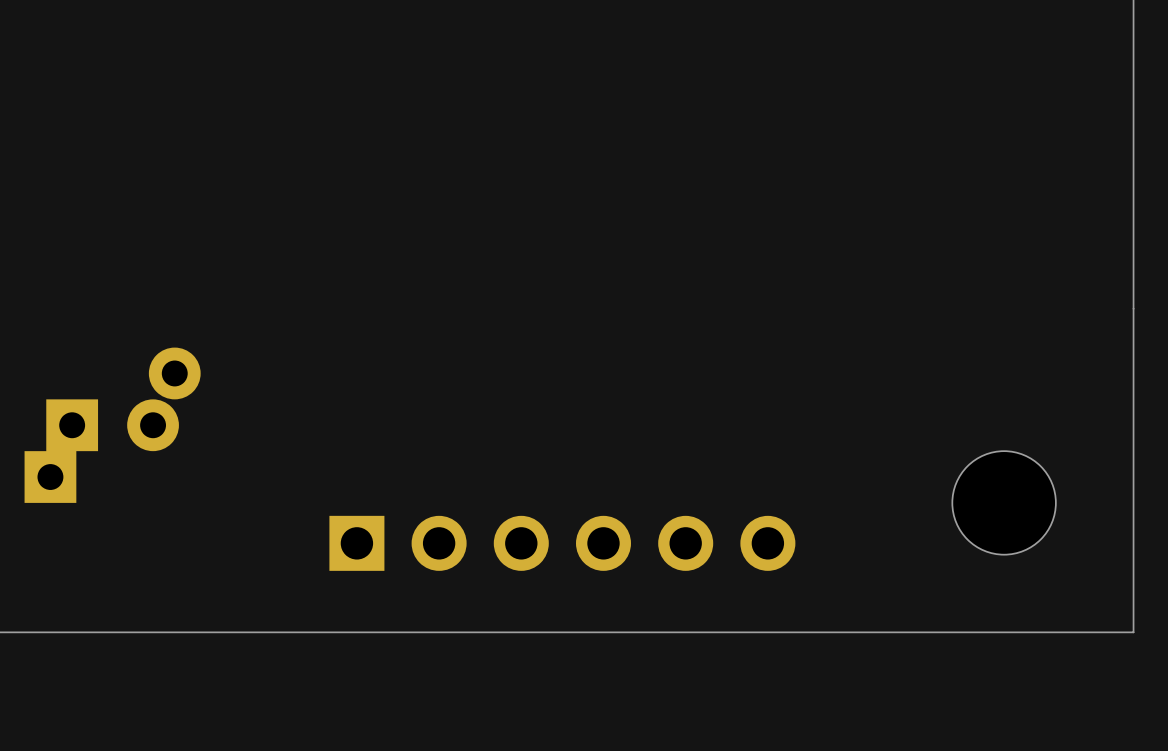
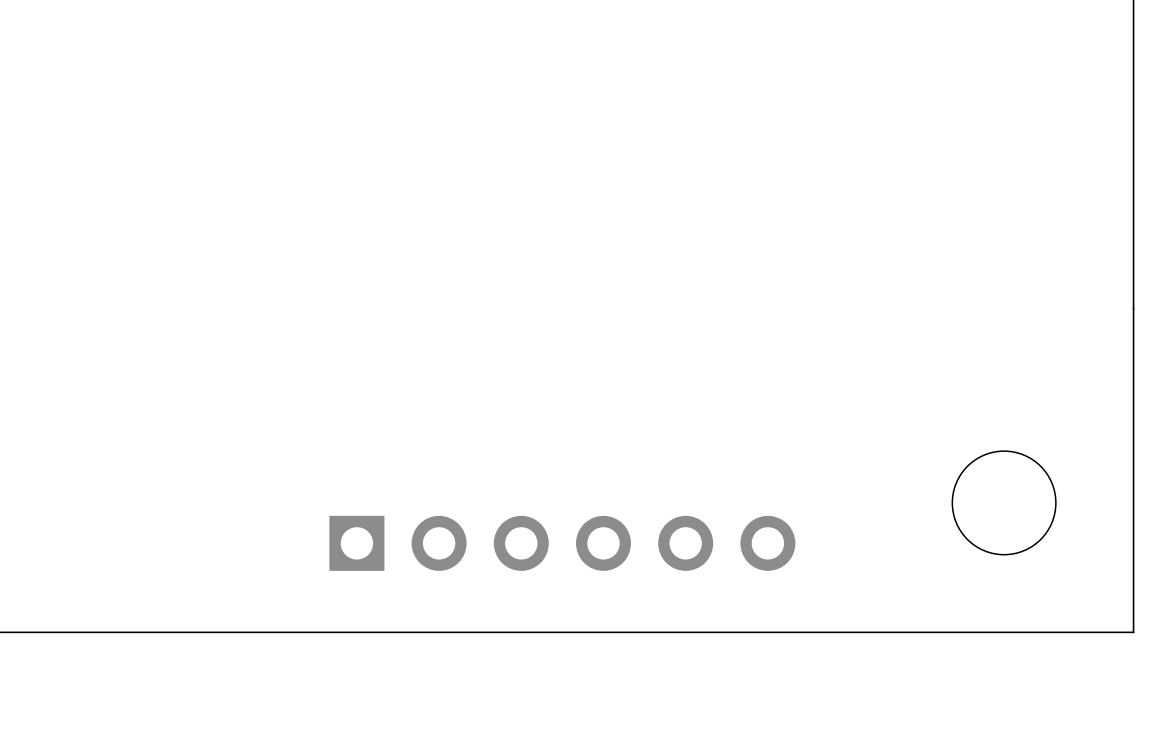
part: (112, 425) -> none

